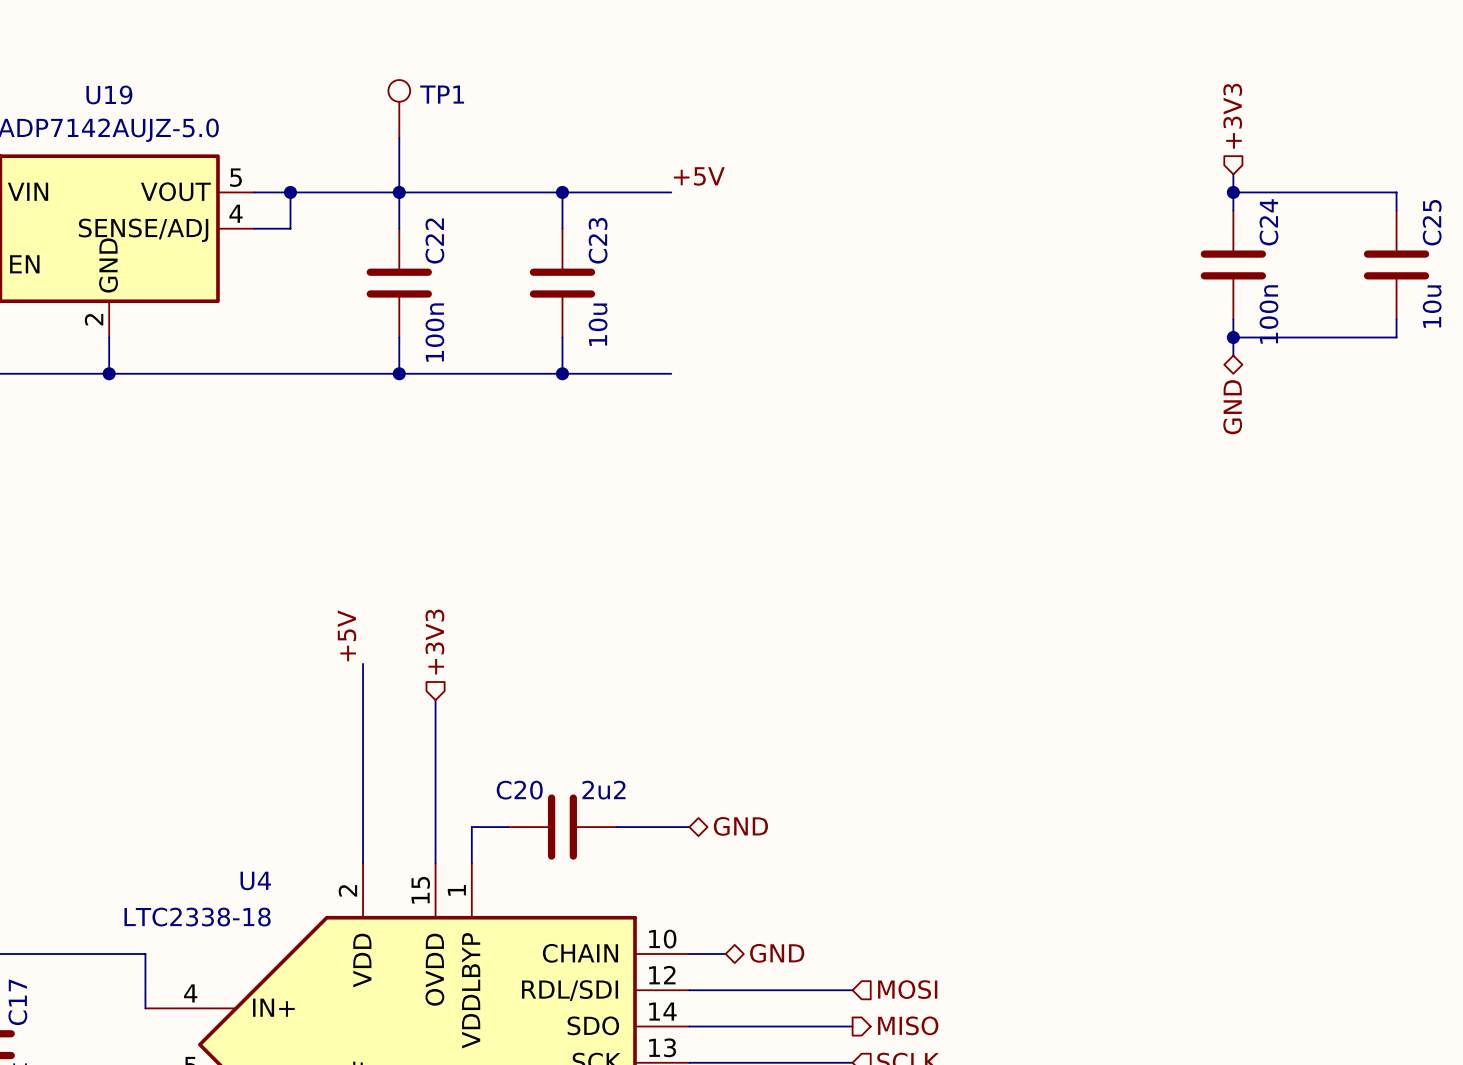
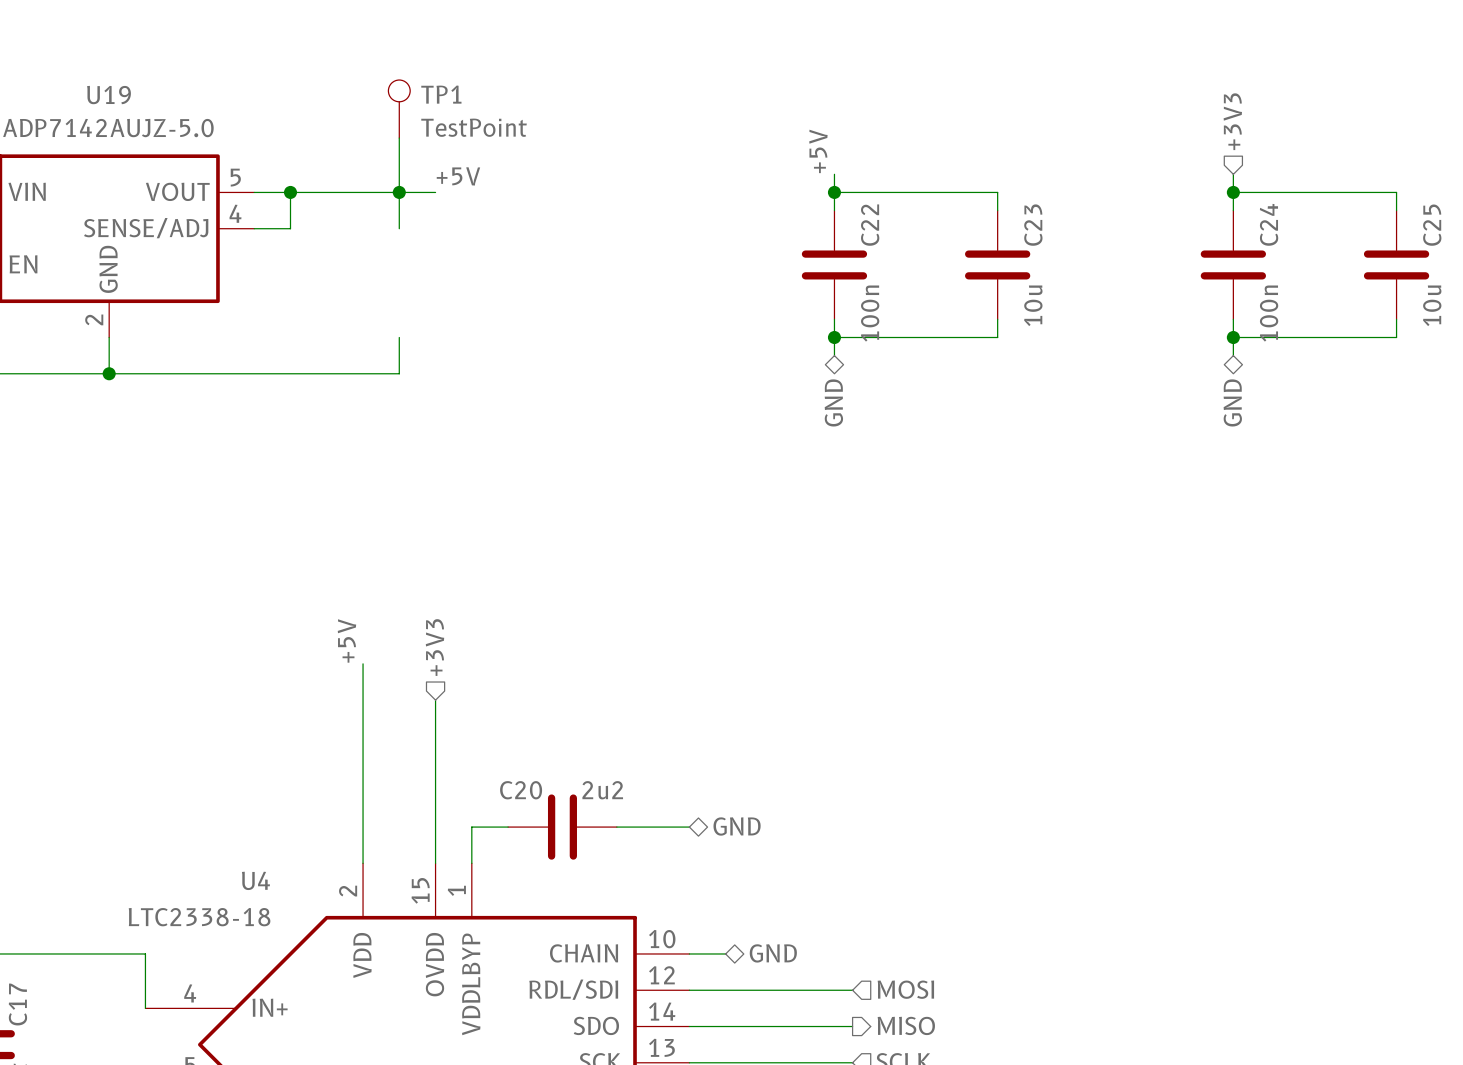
TP1 value: none -> TestPoint (474, 127)
label: none -> +5V (818, 151)
label: none -> +5V (458, 176)
label: +5V (699, 176) -> none
wire: (435, 192) (671, 192) -> none
wire: (562, 192) (562, 228) -> (834, 174) (834, 210)
junction: (562, 192) -> none
wire: none -> (834, 192) (997, 192) (997, 210)
junction: none -> (834, 192)
C22 position: (399, 283) -> (834, 264)
C23 position: (562, 283) -> (997, 264)
wire: none -> (997, 319) (997, 337) (834, 337)
wire: (562, 337) (562, 373) -> (834, 319) (834, 355)
junction: none -> (834, 337)
wire: (399, 373) (671, 373) -> none
junction: (399, 373) -> none
junction: (562, 373) -> none
hierarchical label: none -> GND (833, 402)

